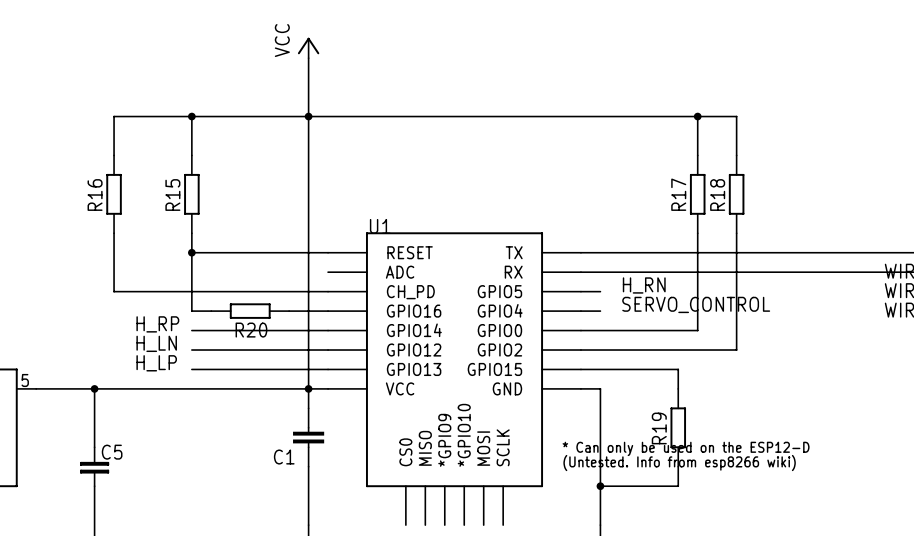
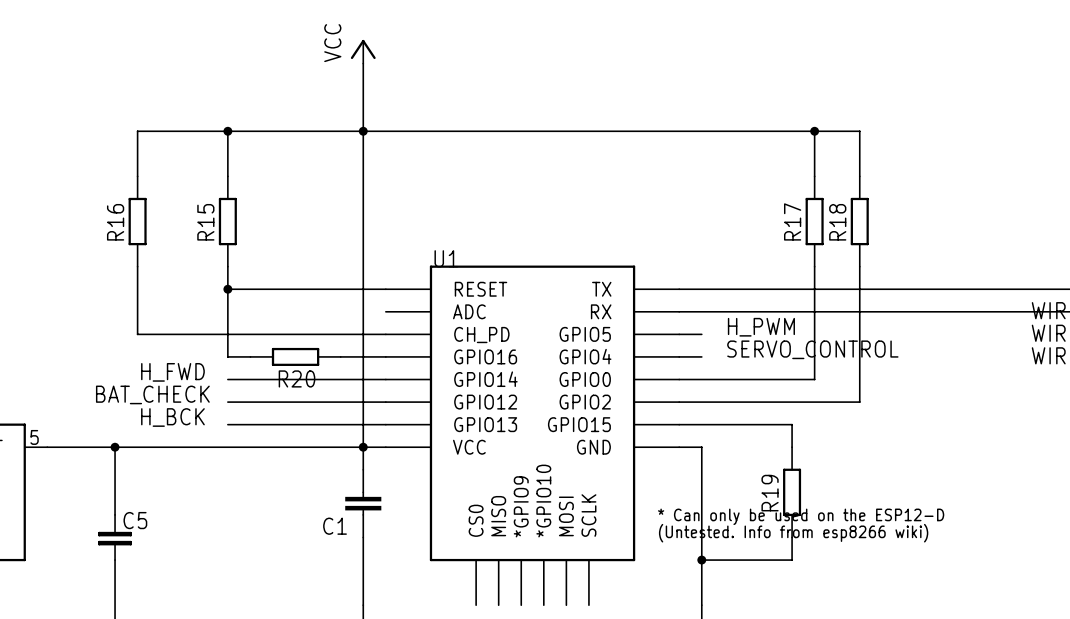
label: H_RN (644, 285) -> H_PWM (761, 327)
label: none -> H_FWD (172, 372)
label: H_RP (157, 324) -> none
label: none -> BAT_CHECK (152, 394)
label: H_LN (156, 343) -> none
label: none -> H_BCK (172, 417)
label: H_LP (156, 363) -> none

